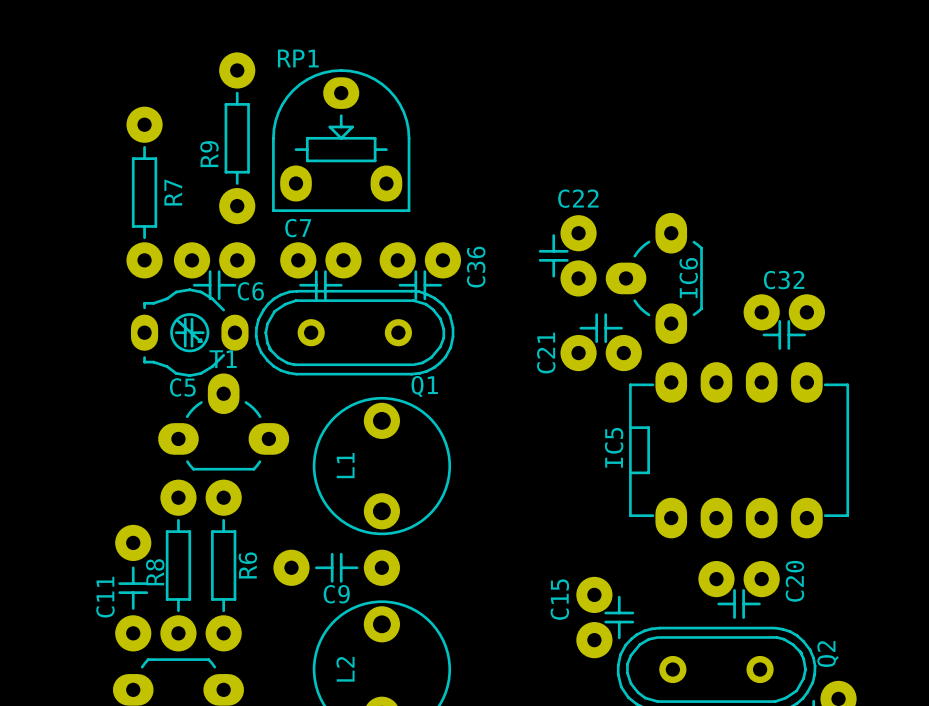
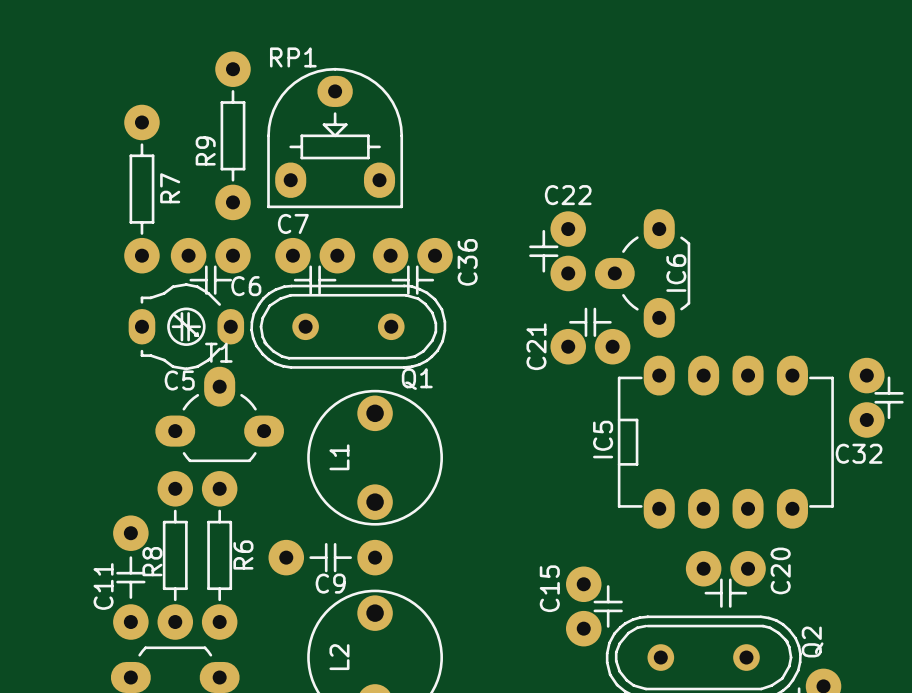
C32 name position: C32 (784, 280) -> C32 (859, 453)
C32 rotation: 0° (784, 322) -> 90° counterclockwise (876, 397)
C32 position: (784, 322) -> (876, 397)

